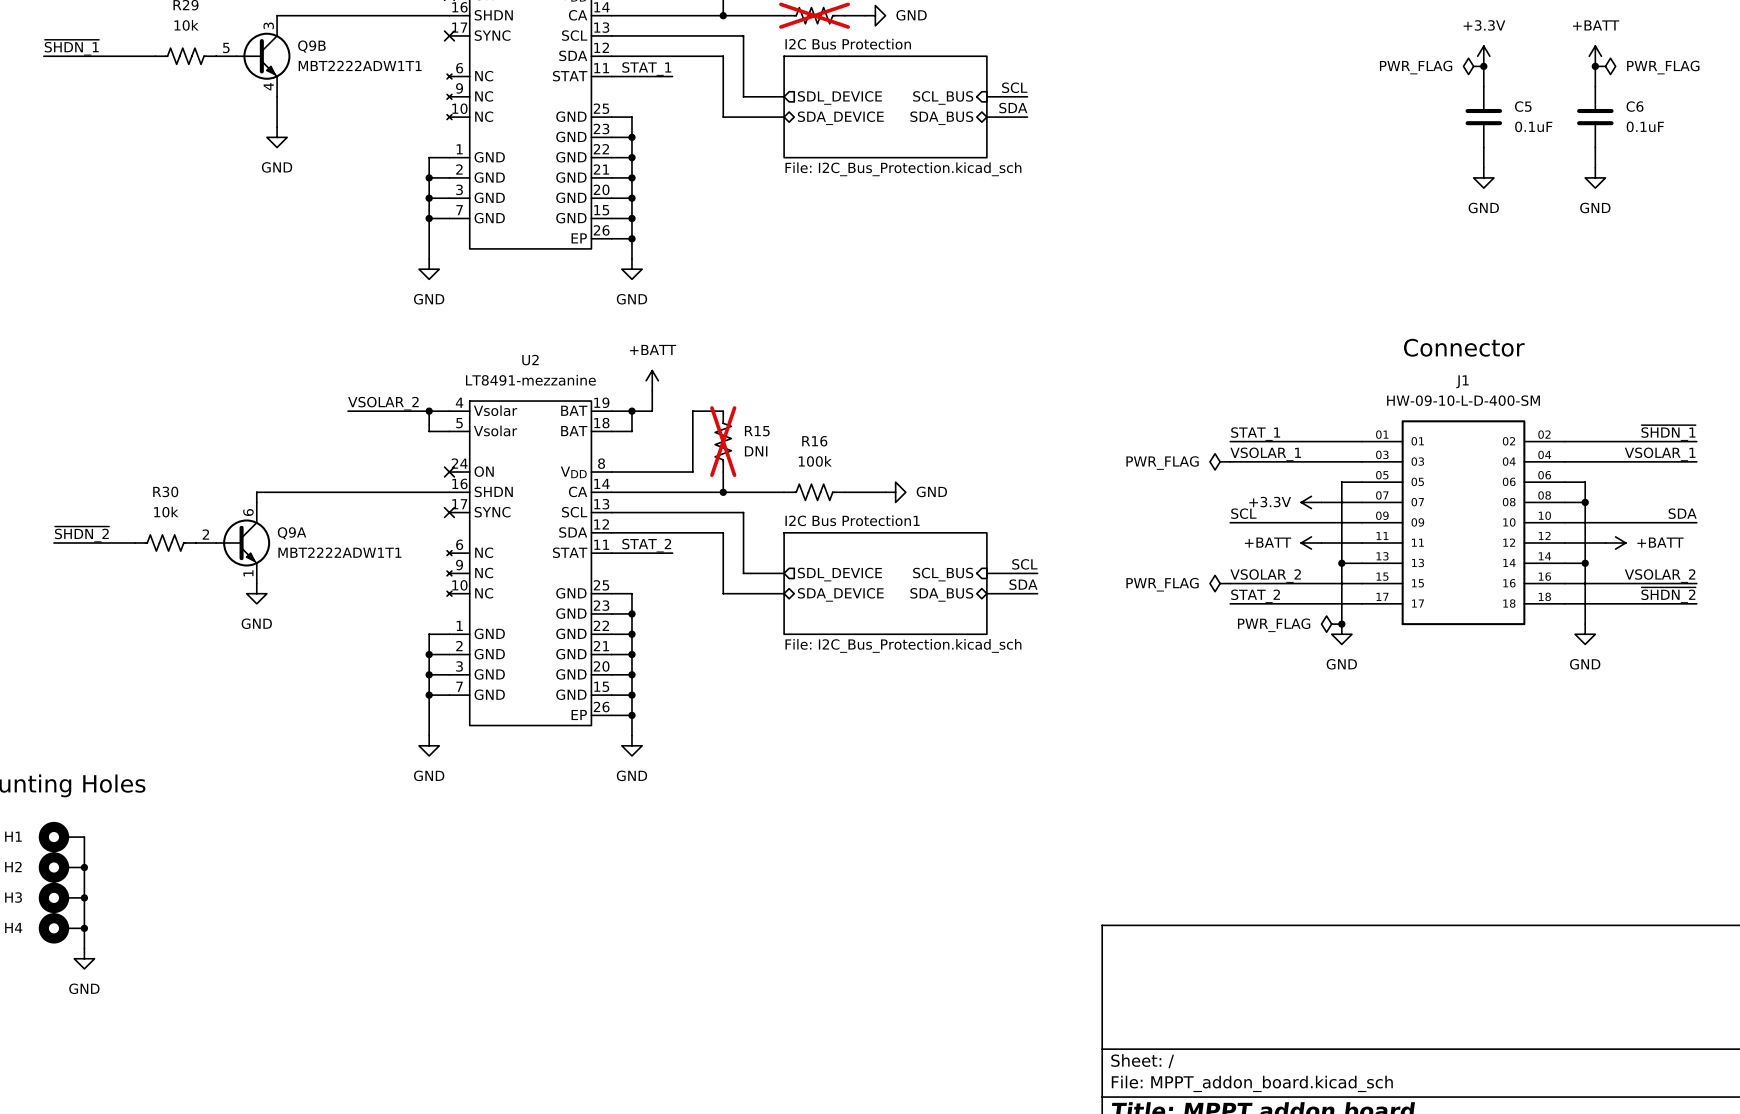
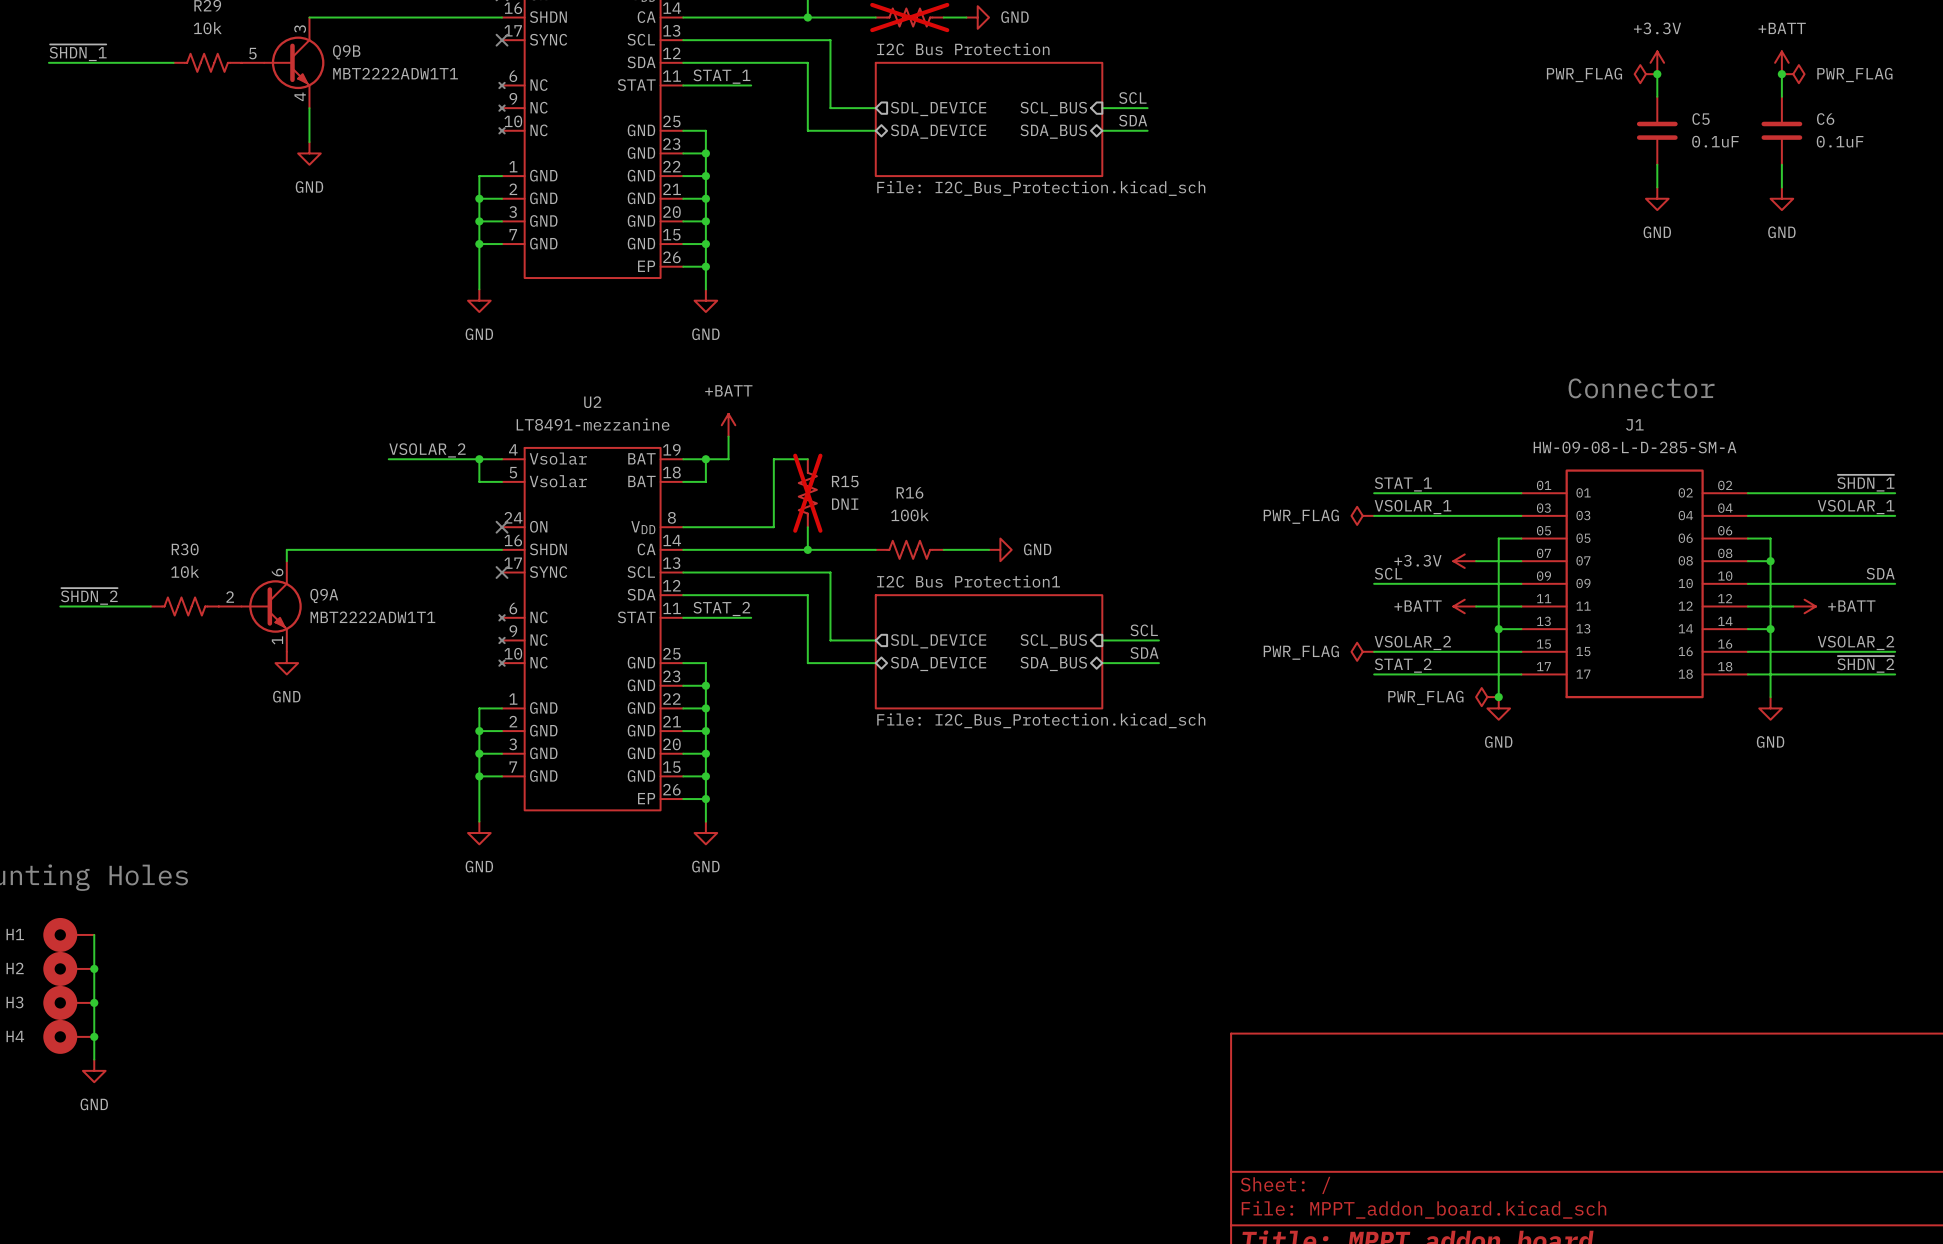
J1 value: HW-09-10-L-D-400-SM (1463, 400) -> HW-09-08-L-D-285-SM-A (1635, 447)

